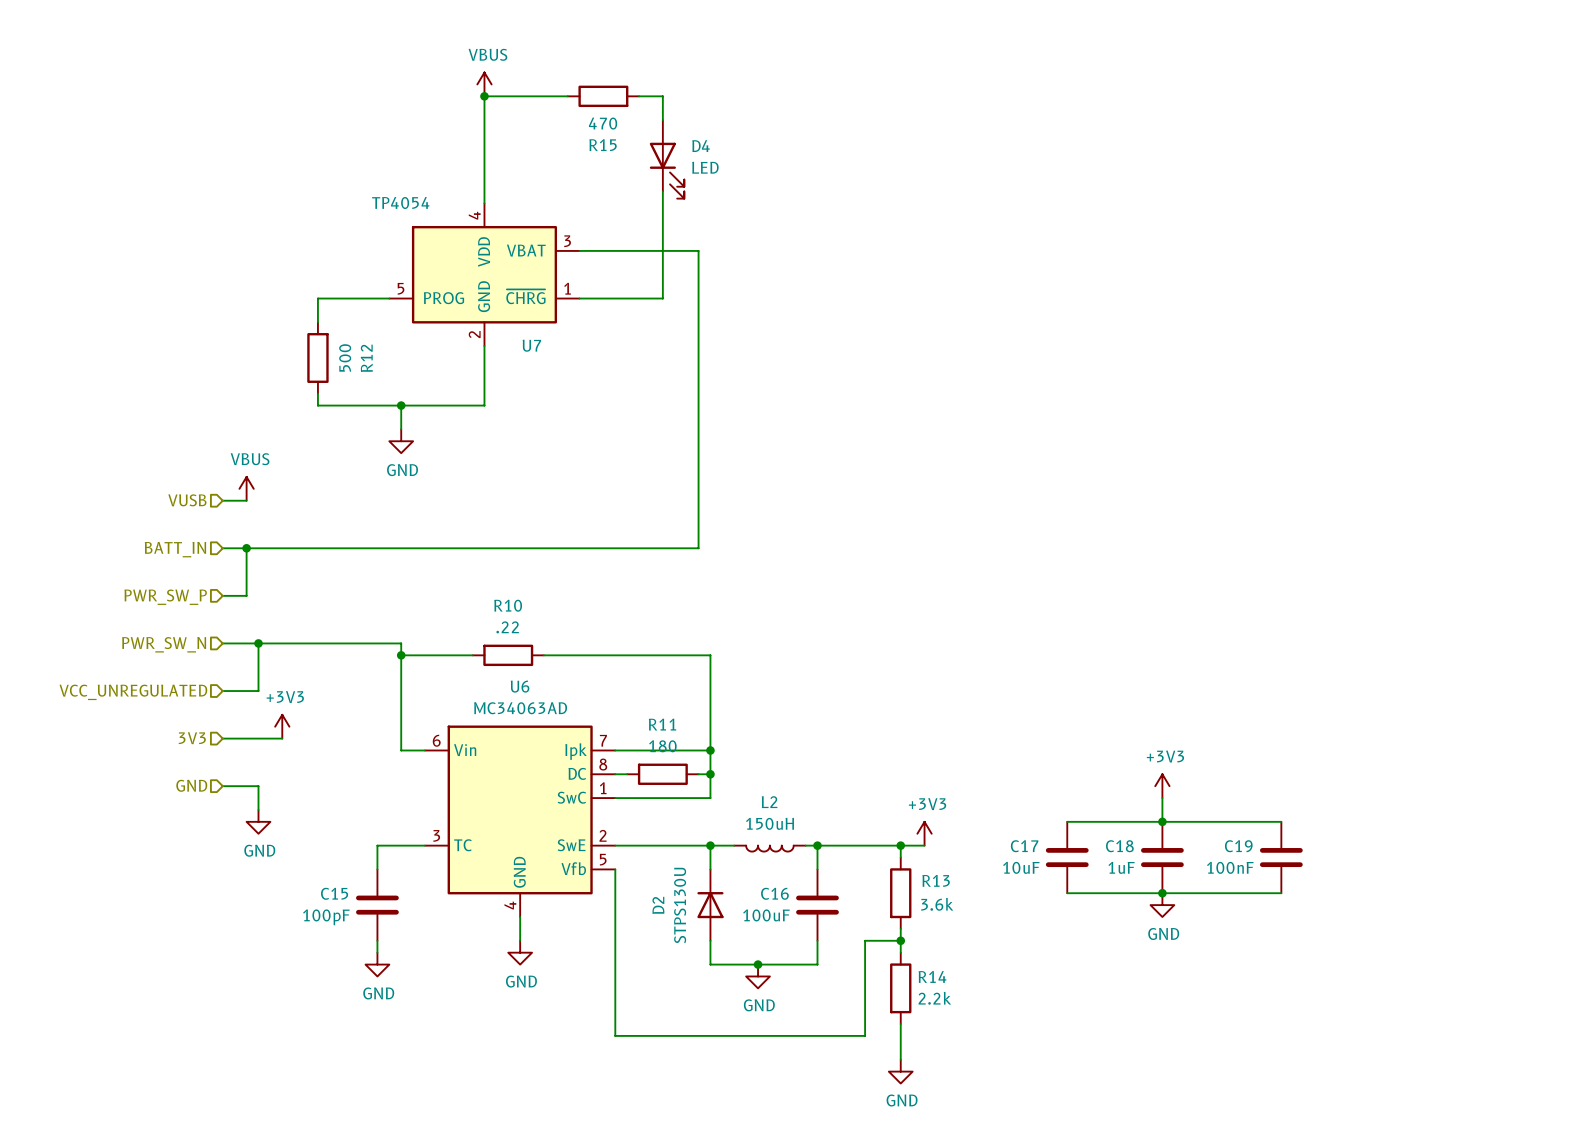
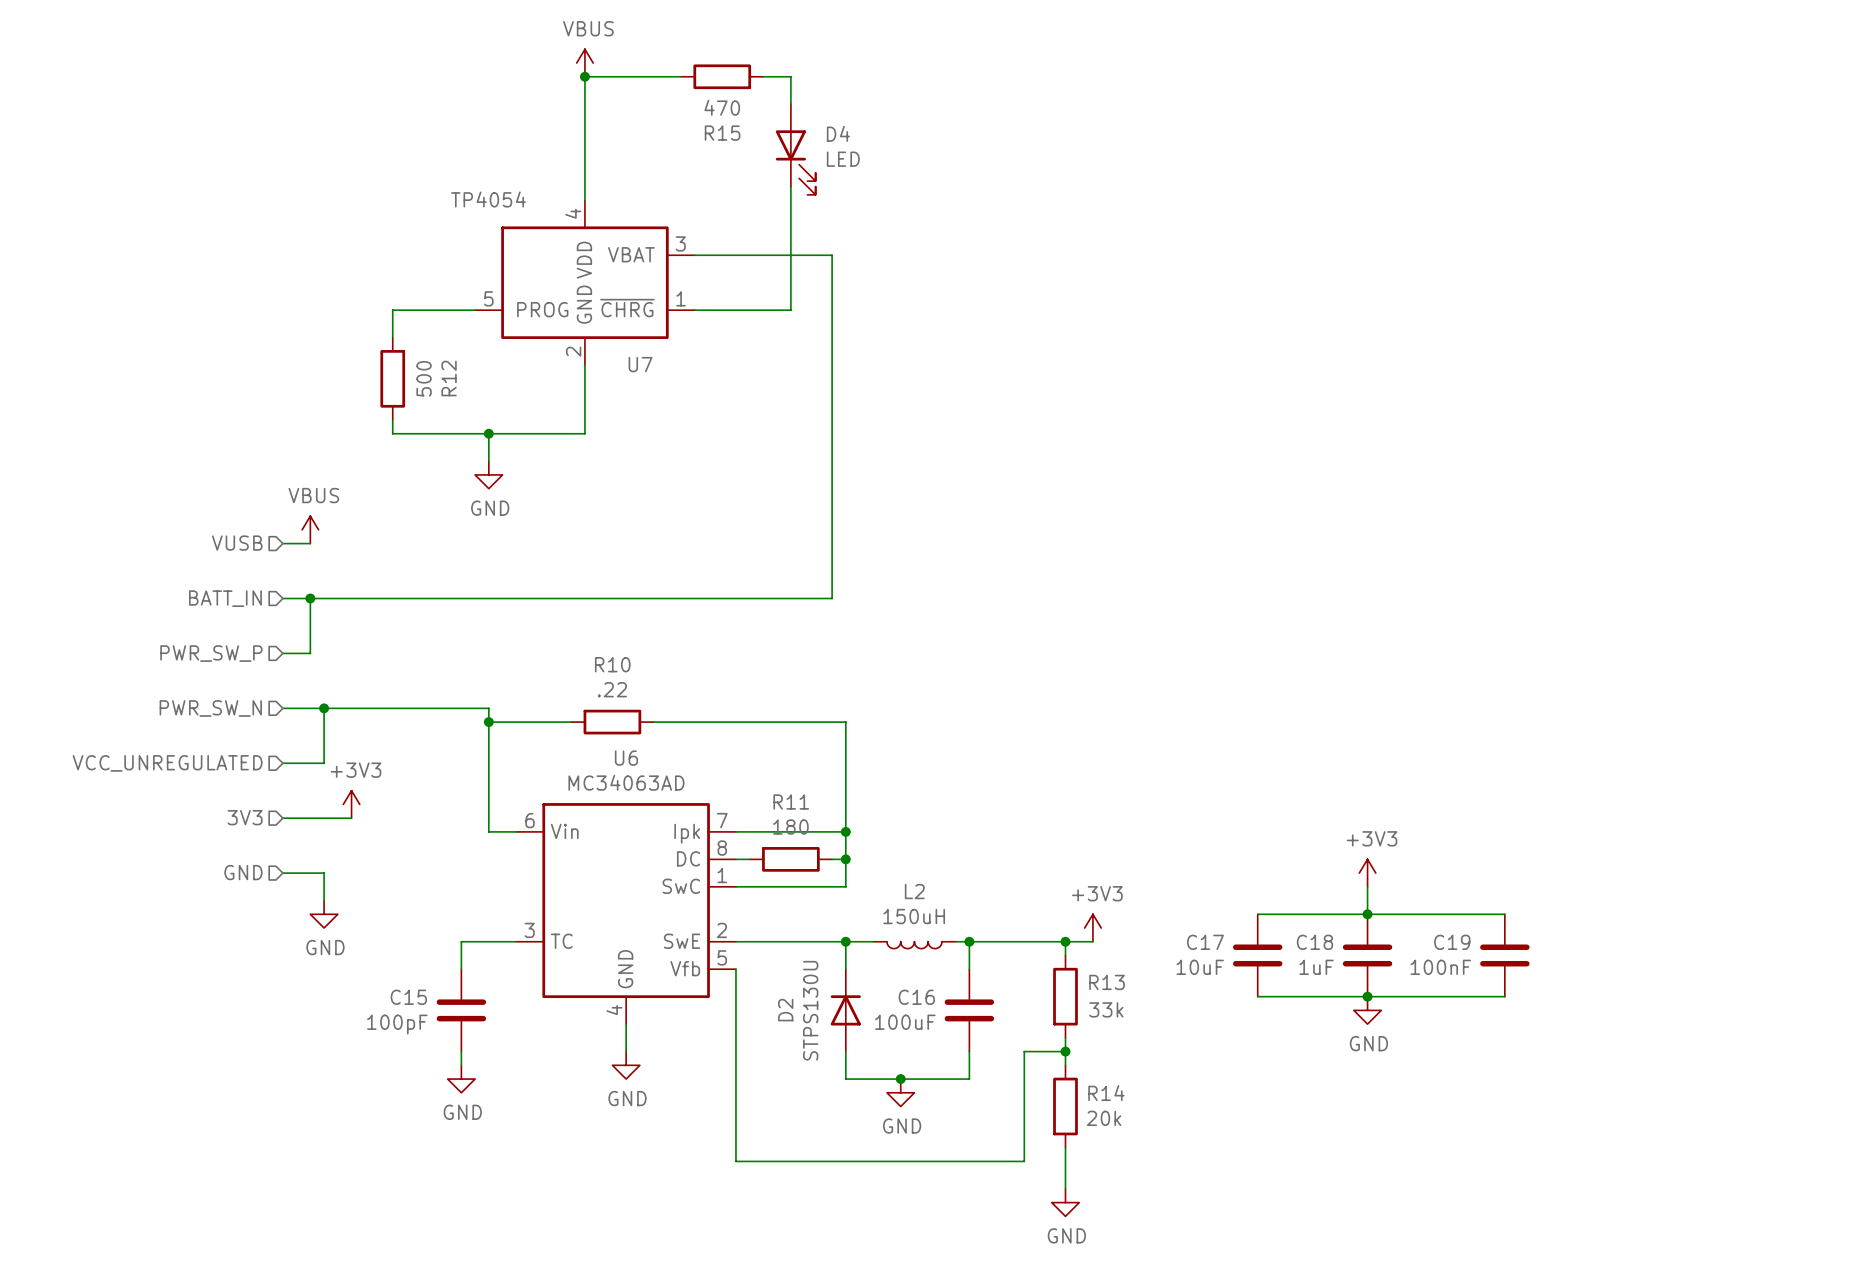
R13 value: 3.6k (937, 904) -> 33k (1106, 1009)
R14 value: 2.2k (934, 998) -> 20k (1104, 1118)

